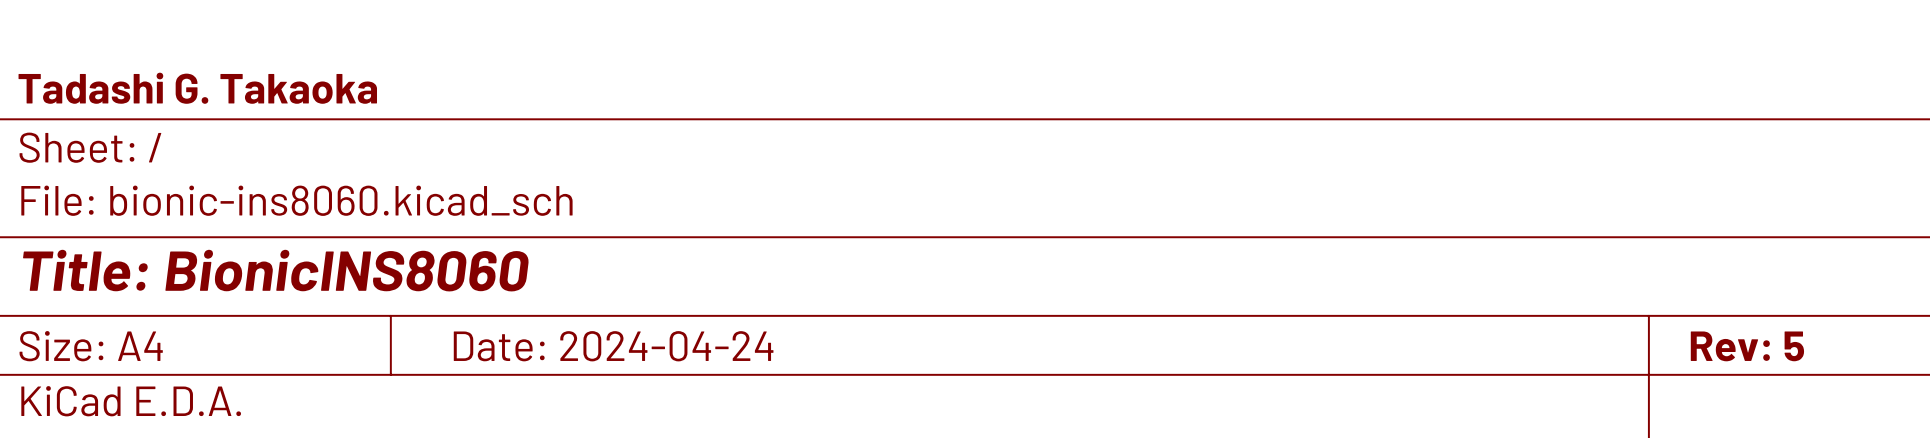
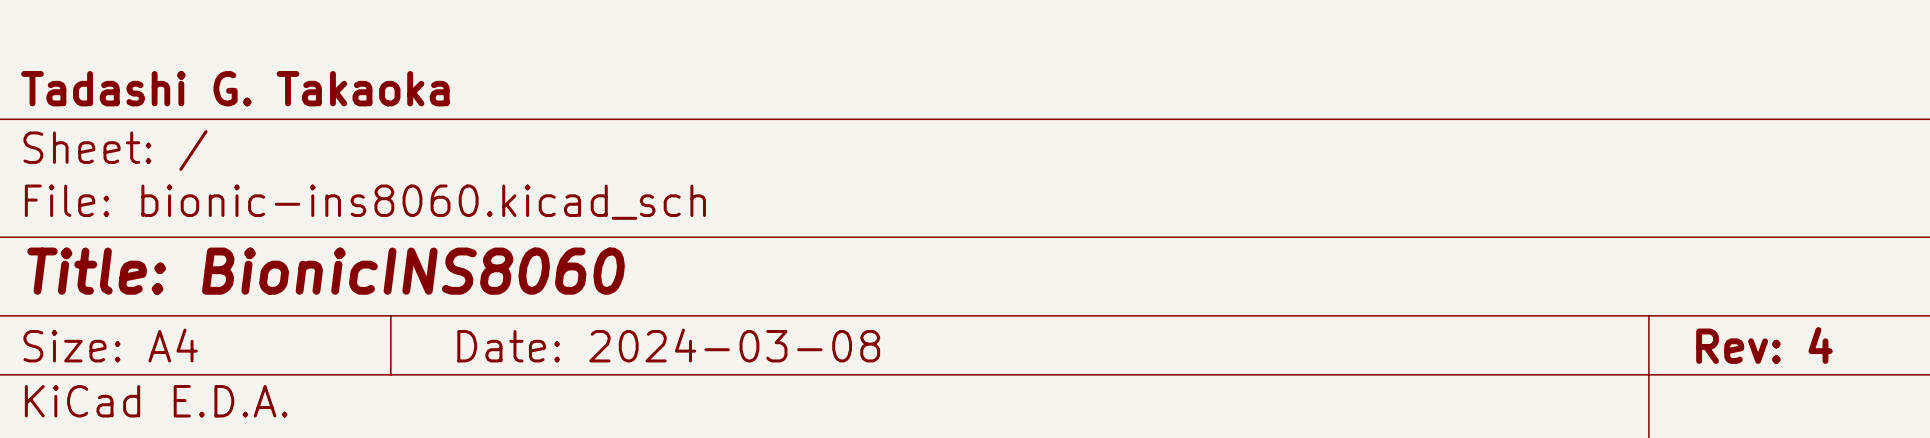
title block: Date: 2024-04-24 (613, 346) -> Date: 2024-03-08 (668, 345)
title block: Rev: 5 (1747, 346) -> Rev: 4 (1764, 345)

